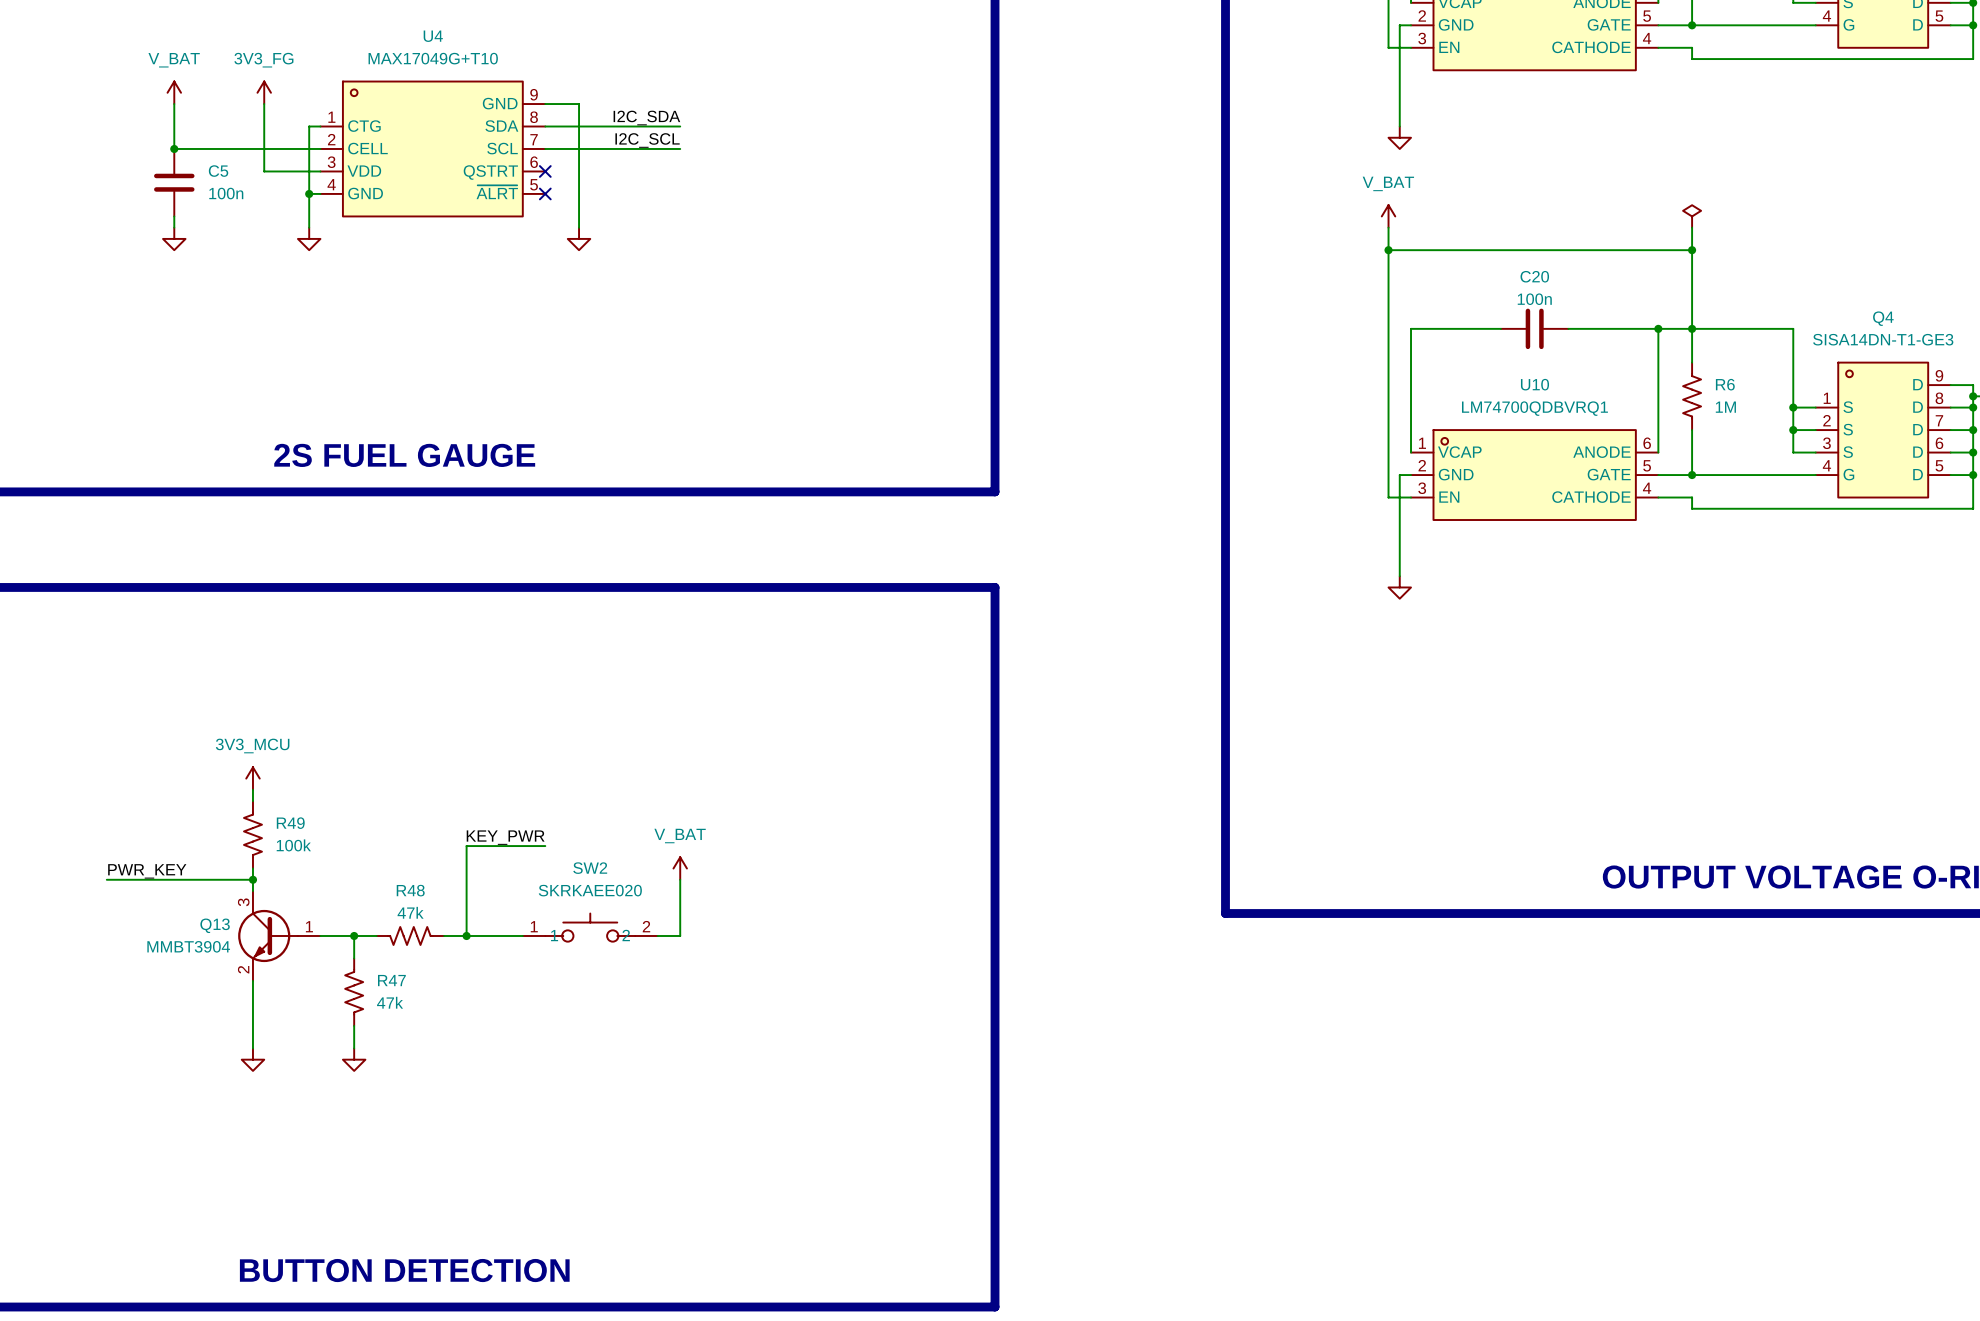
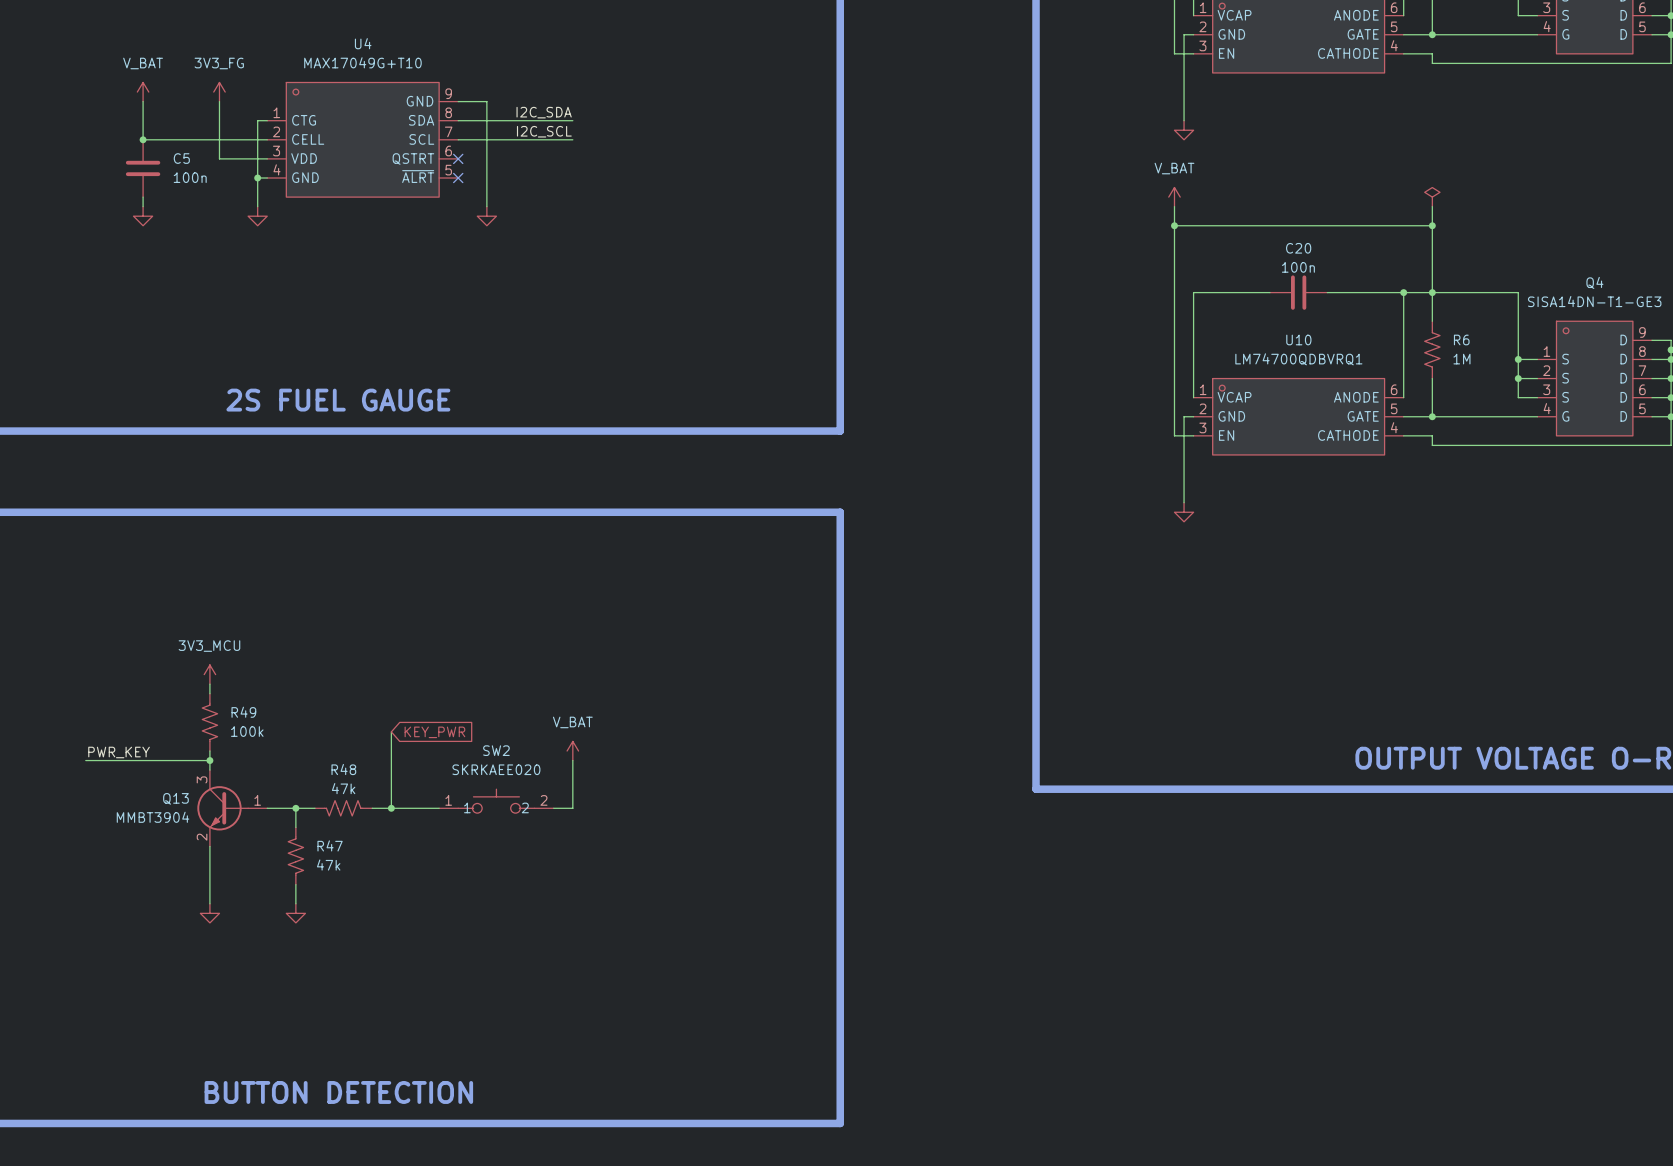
label: KEY_PWR (505, 837) -> none
wire: (466, 846) (545, 846) -> none
global label: none -> KEY_PWR (434, 732)

